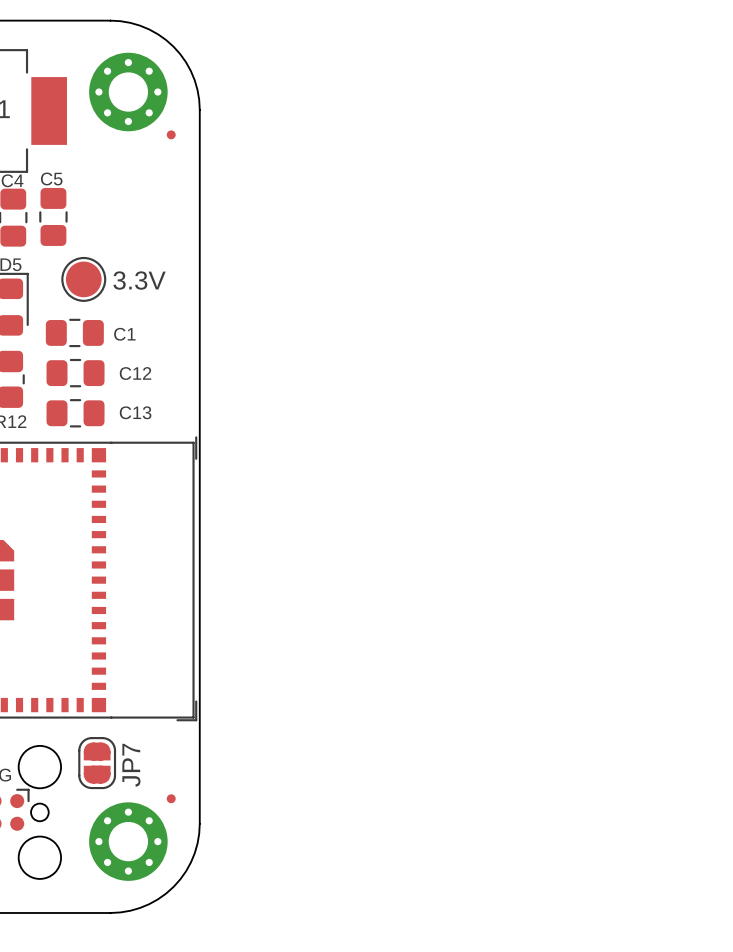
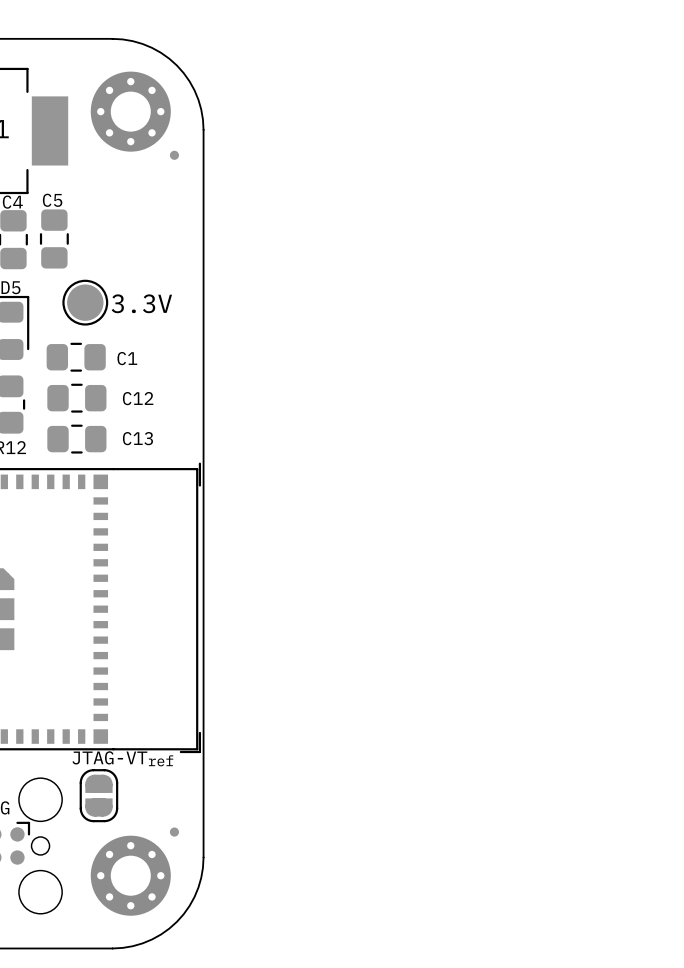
JP7 value: none -> JTAG-VTref (122, 758)
JP7 name: JP7 (131, 765) -> none

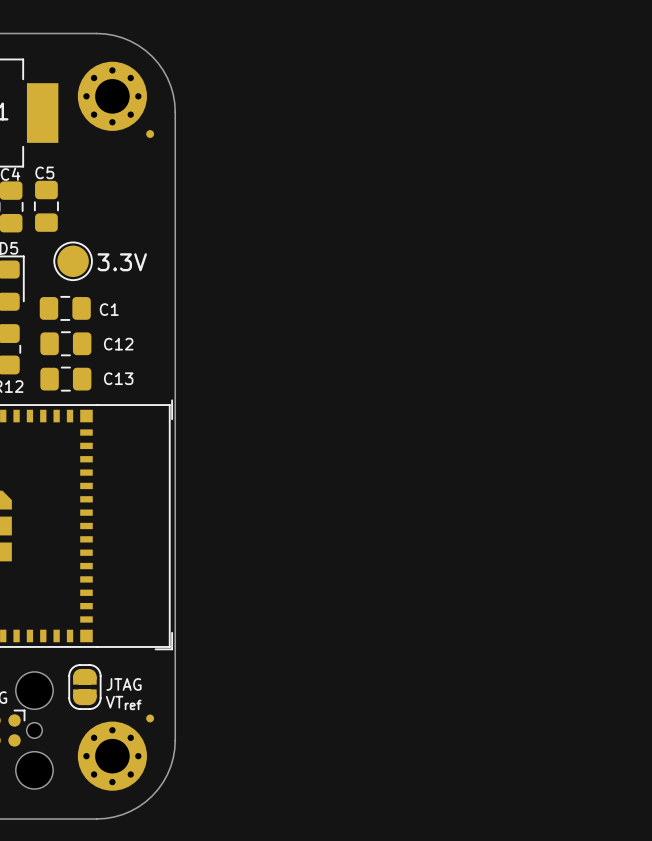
part value: JTAG-VTref (122, 758) -> none
text: none -> JTAG (124, 684)
text: none -> VTref (123, 703)

